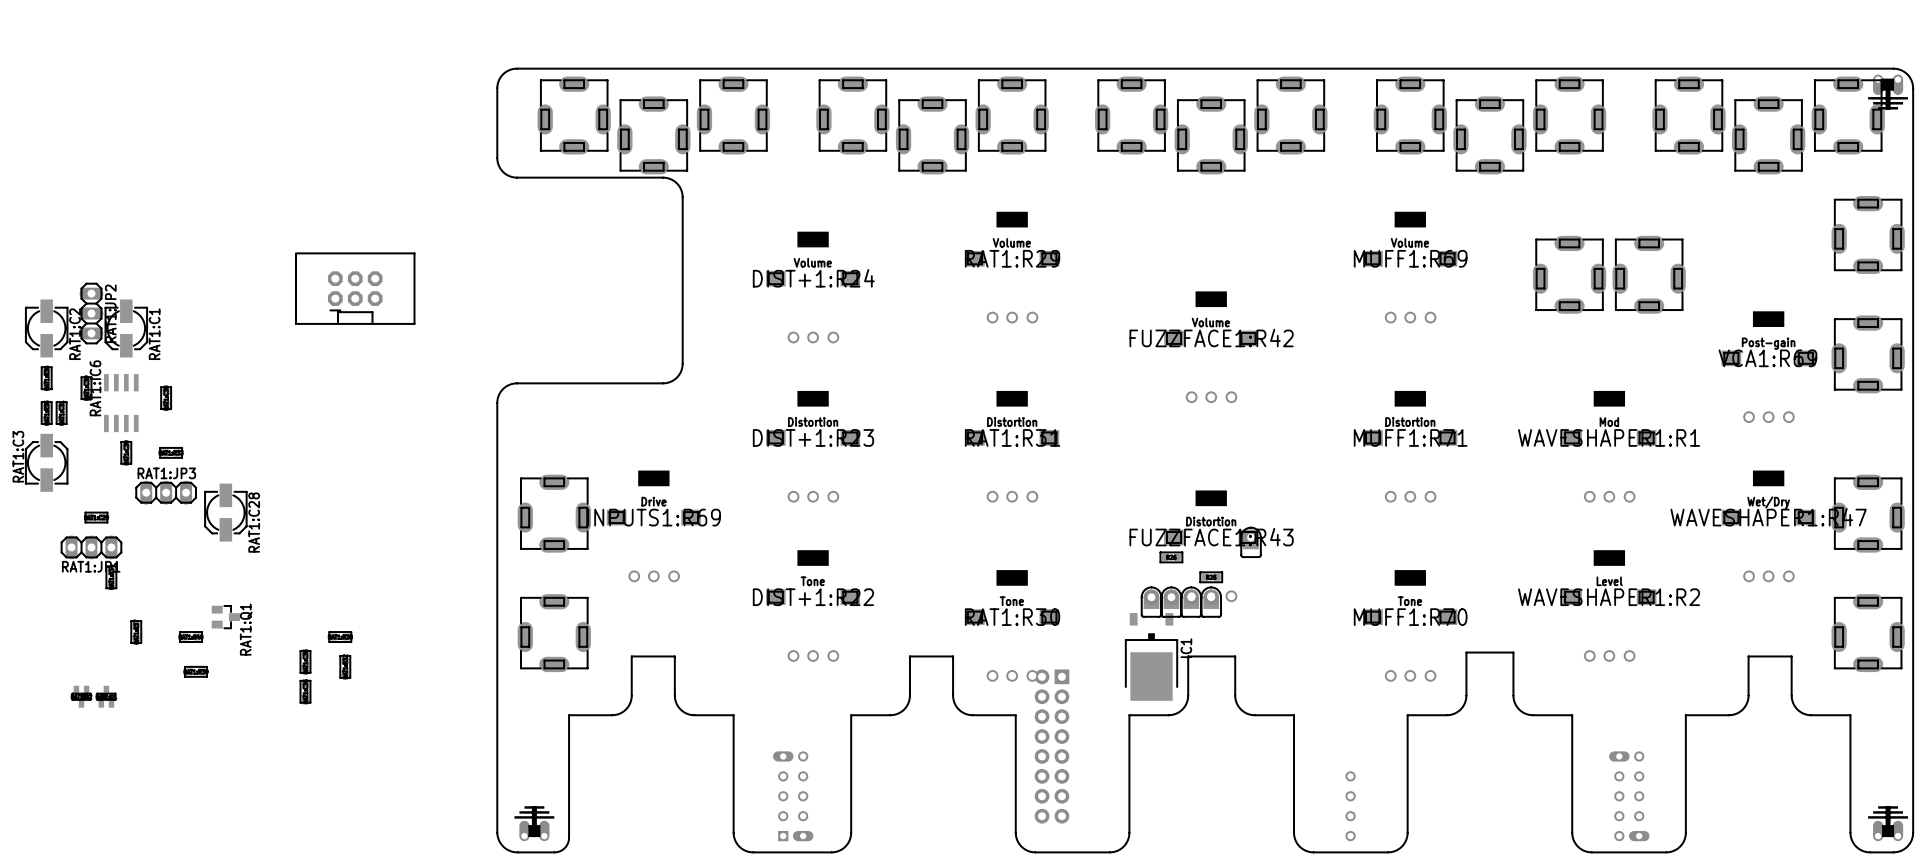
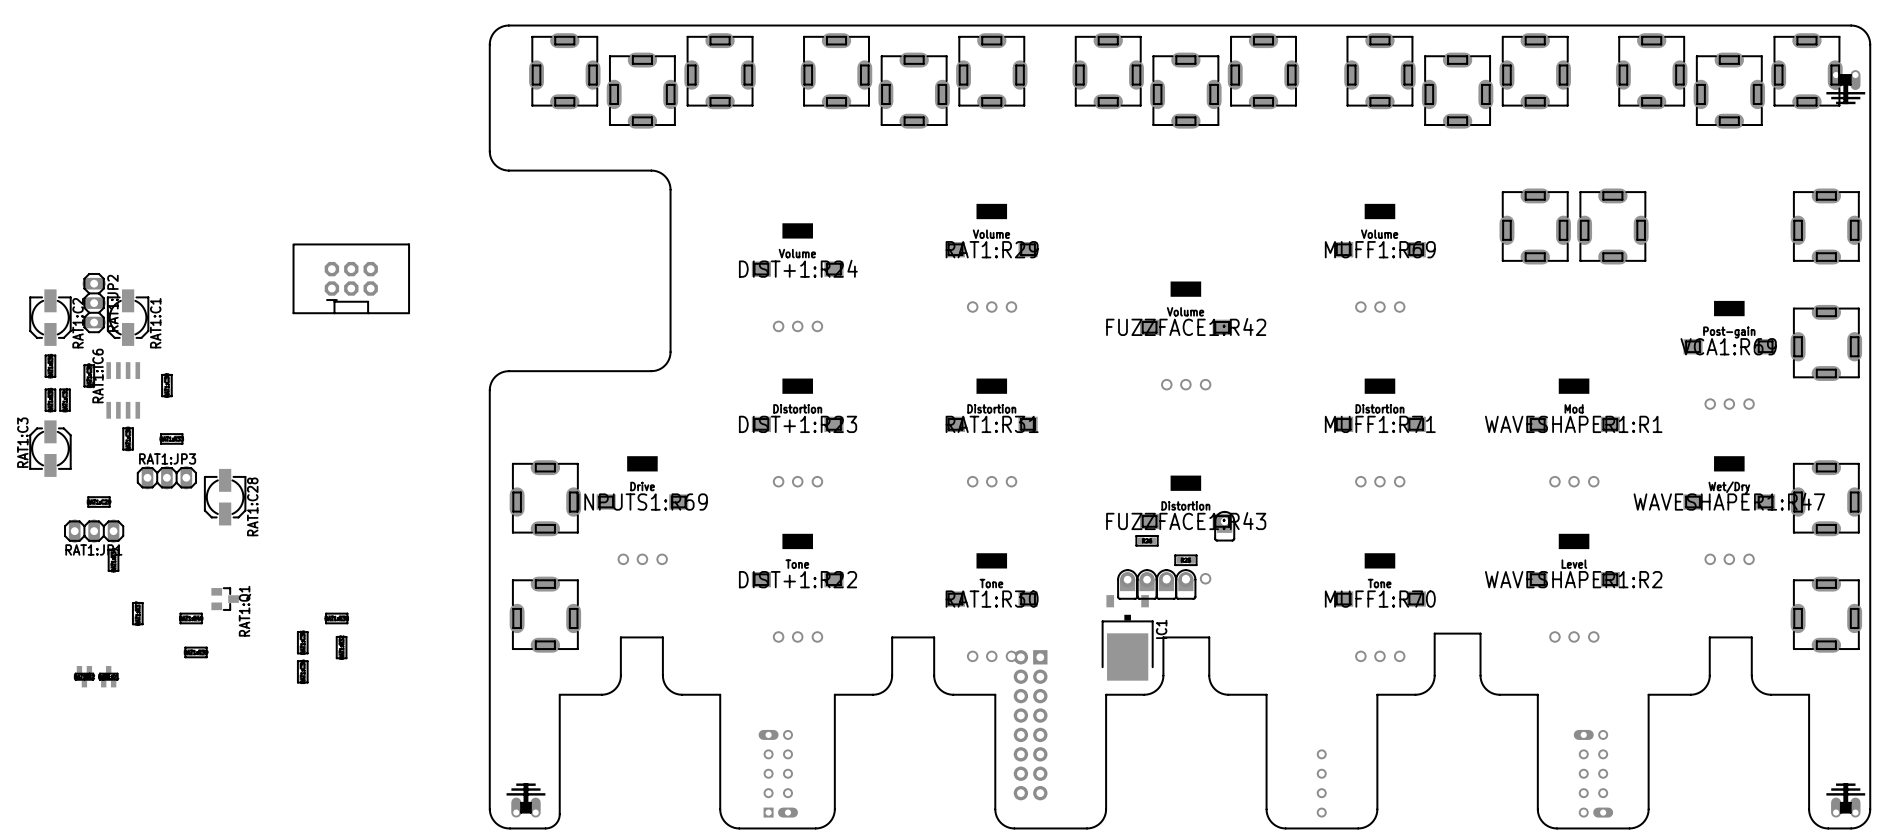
drawing: none -> [489, 25, 1871, 829]
drawing: [496, 68, 1914, 853] -> none
part position: (574, 115) -> (564, 71)
part position: (733, 115) -> (720, 71)
part position: (852, 115) -> (836, 71)
part position: (1012, 115) -> (991, 71)
part position: (1131, 115) -> (1108, 71)
part position: (1290, 115) -> (1263, 71)
part position: (1410, 115) -> (1379, 71)
part position: (1569, 115) -> (1535, 71)
part position: (1689, 115) -> (1651, 71)
part position: (1848, 115) -> (1806, 71)
part position: (653, 135) -> (642, 90)
part position: (932, 135) -> (914, 90)
part position: (1211, 135) -> (1185, 90)
part position: (1489, 135) -> (1457, 90)
part position: (1768, 135) -> (1729, 90)
part position: (1569, 274) -> (1535, 226)
part position: (1649, 274) -> (1612, 226)

